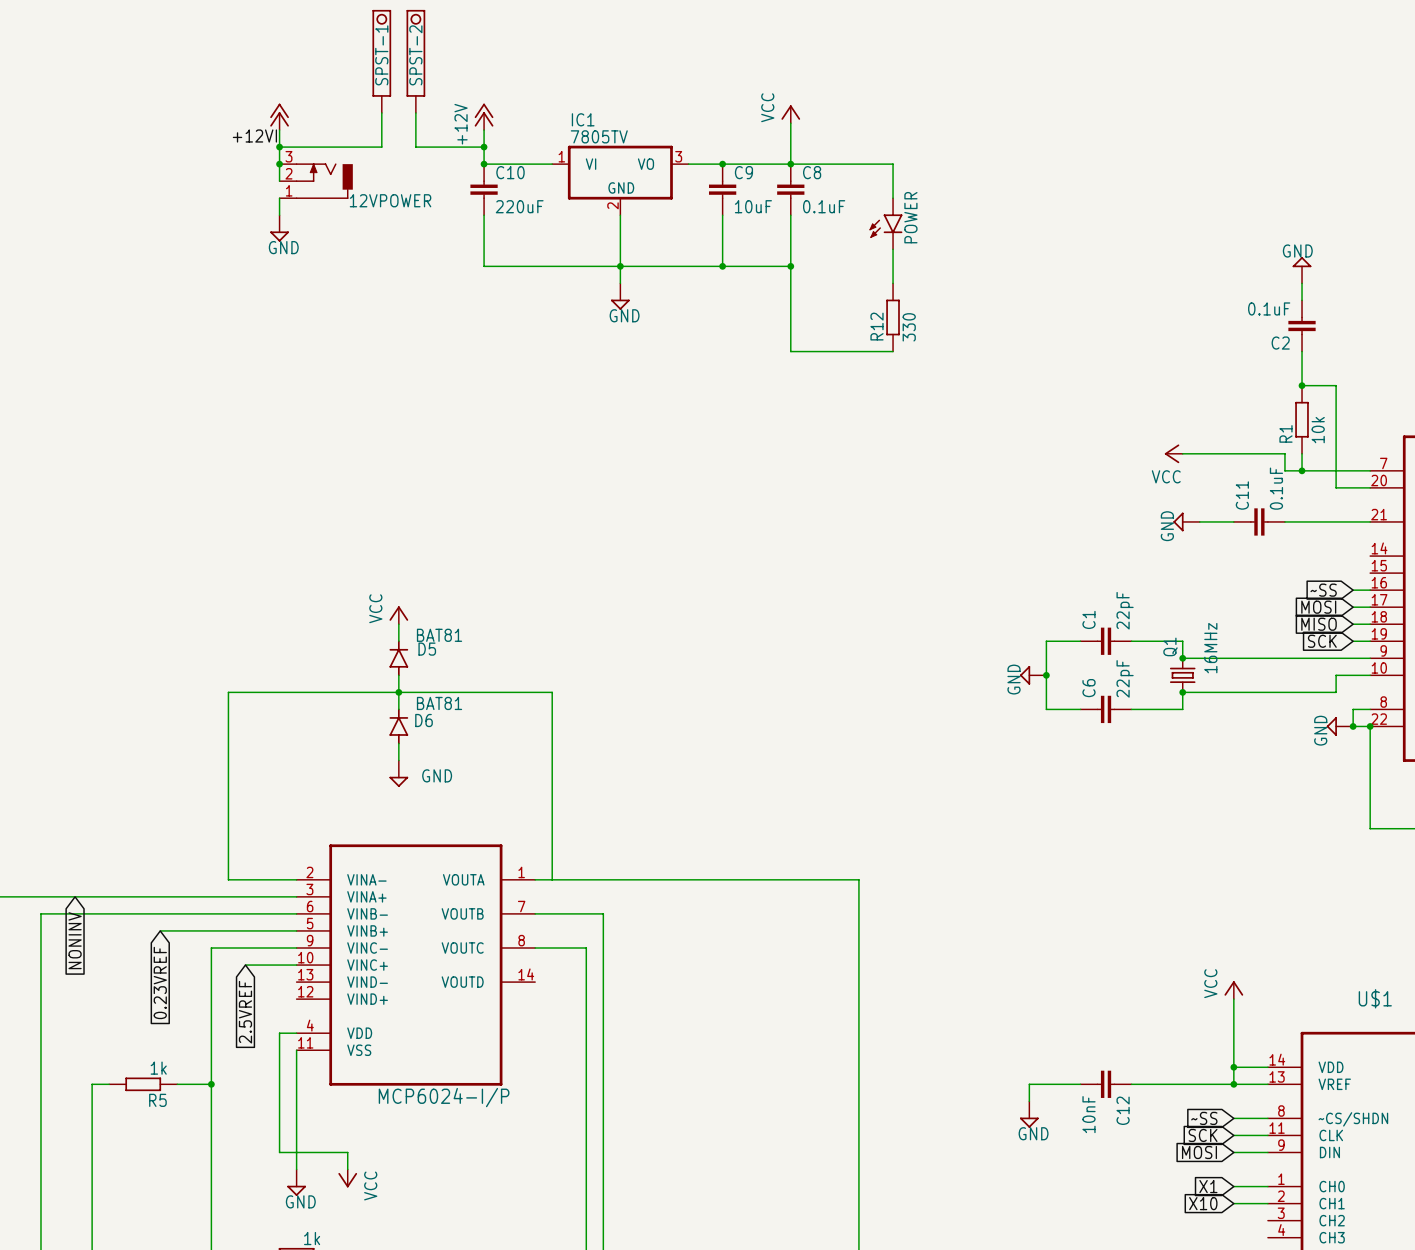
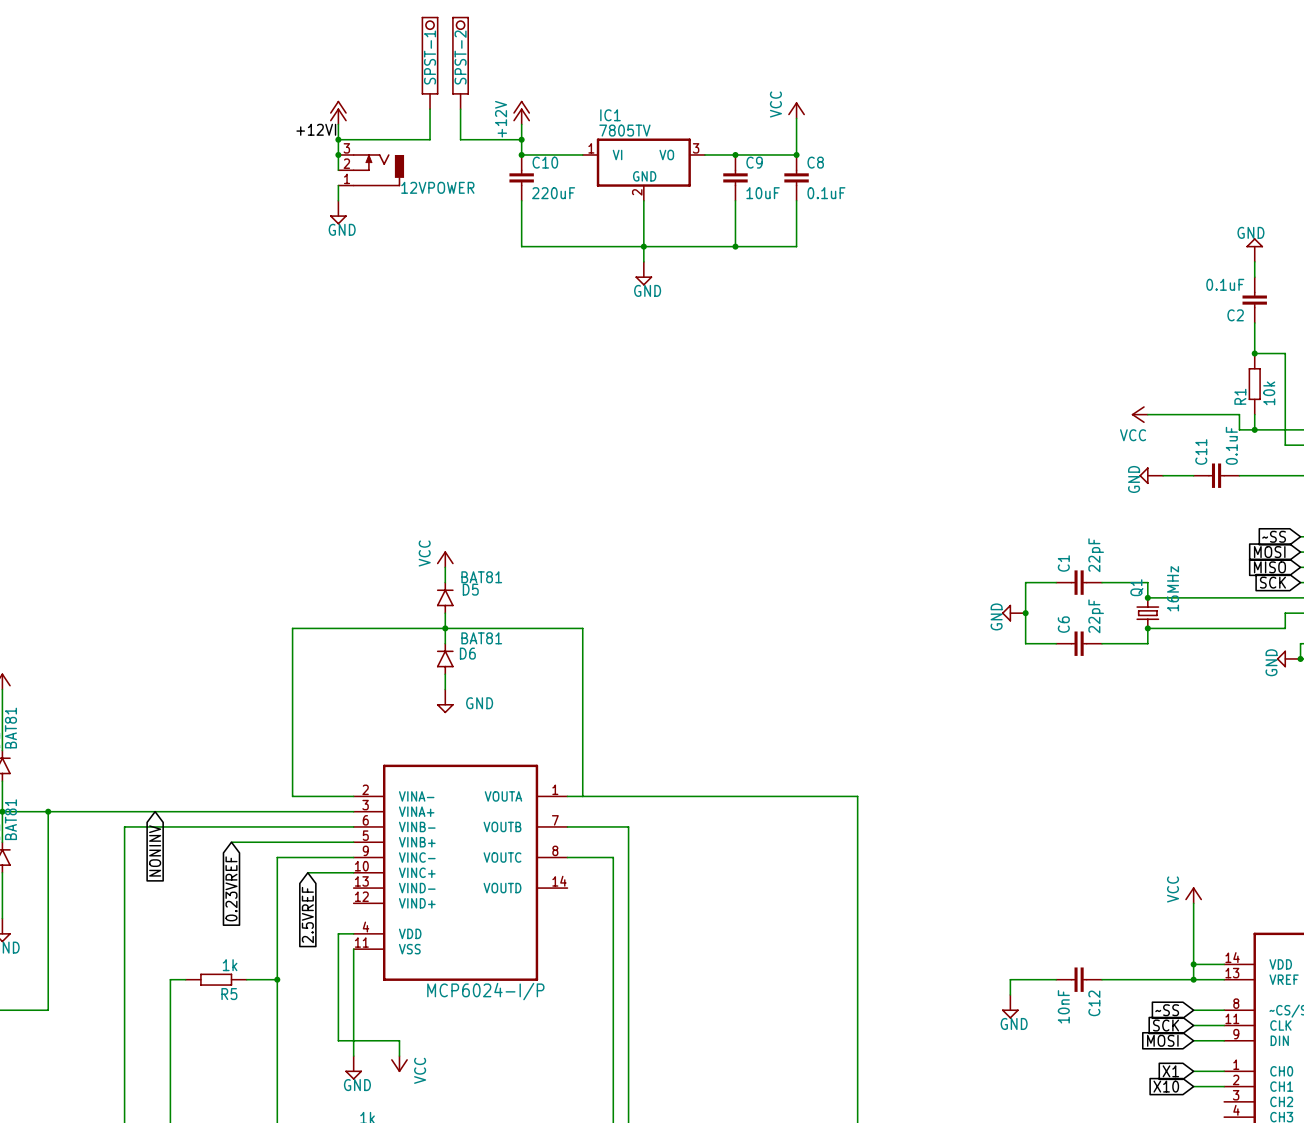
wire: (790, 164) (893, 164) (893, 198) -> none
POWER: (885, 223) -> none
wire: (893, 249) (893, 283) -> none
wire: (790, 266) (790, 351) (893, 351) -> none
junction: (790, 266) -> none
R12: 330 (893, 317) -> none

